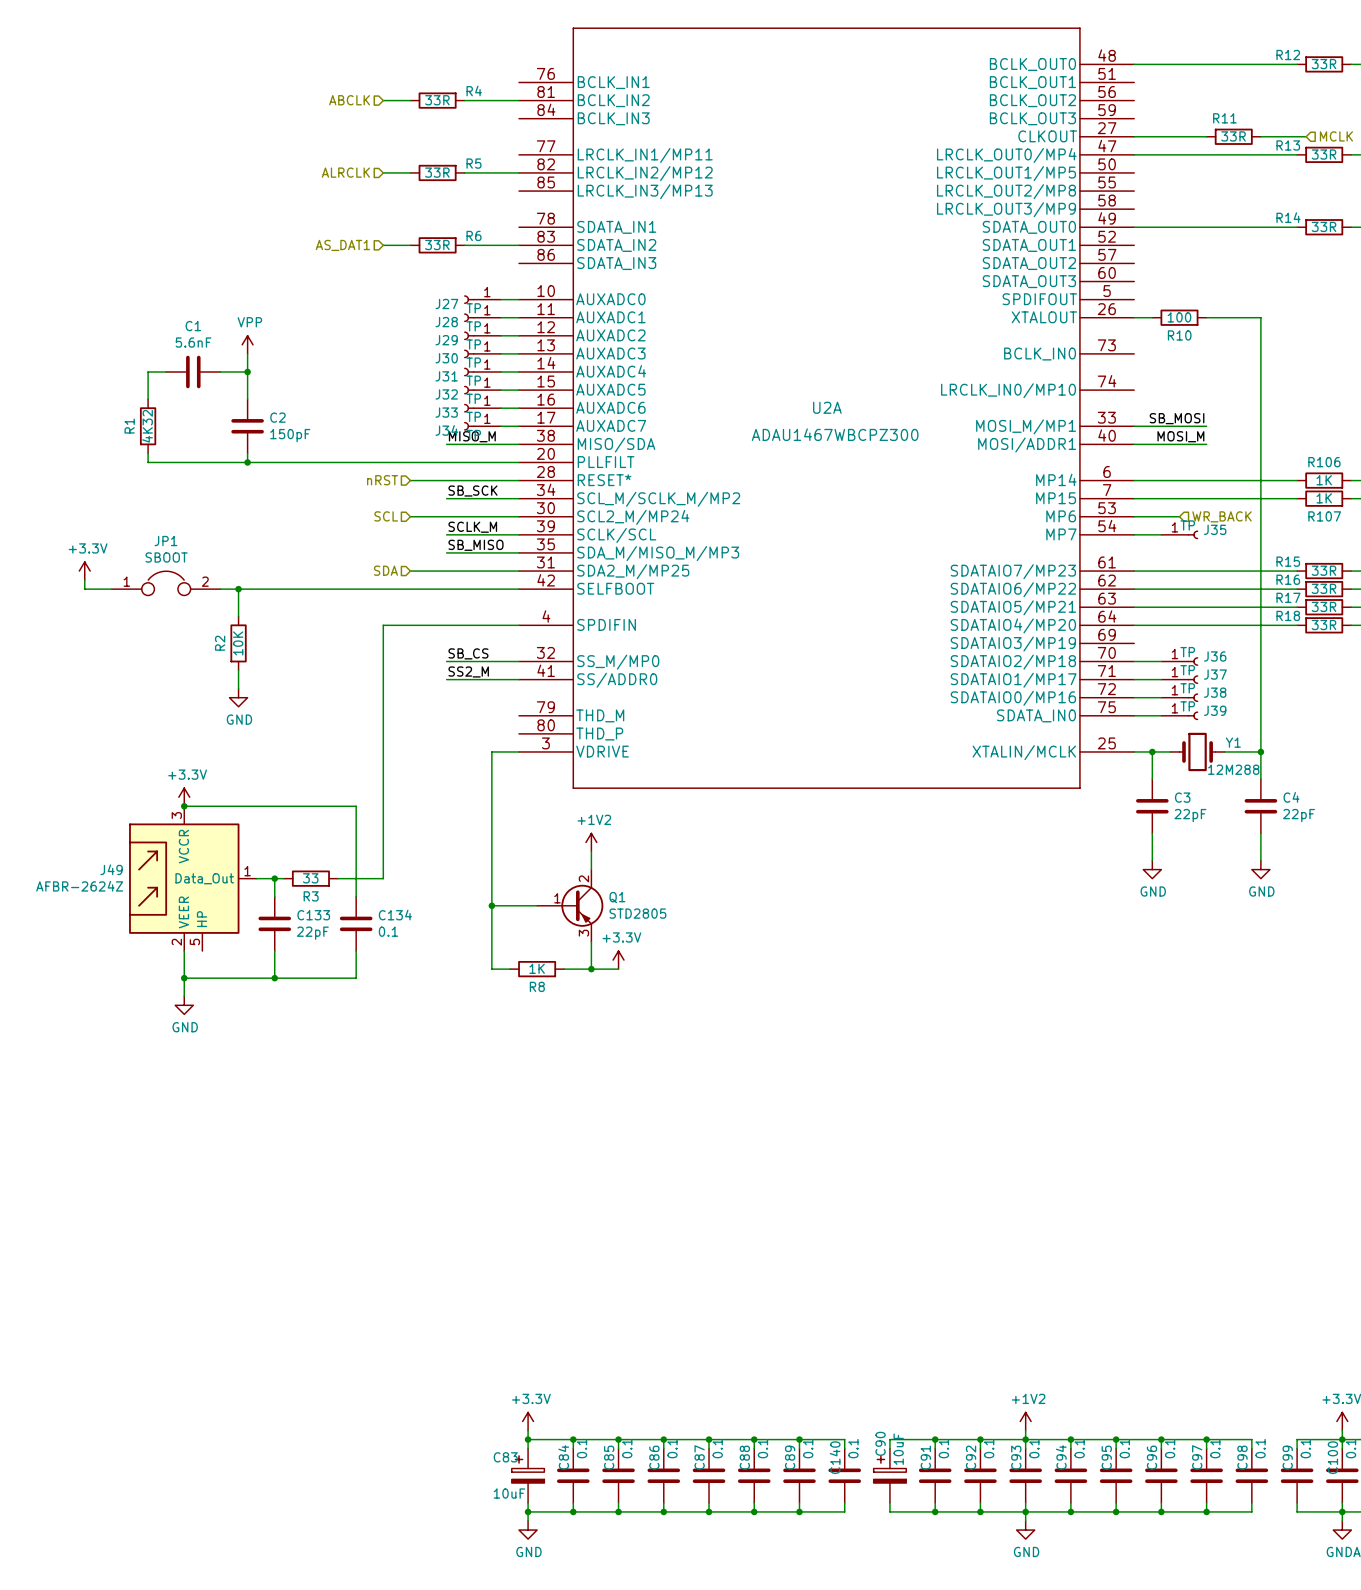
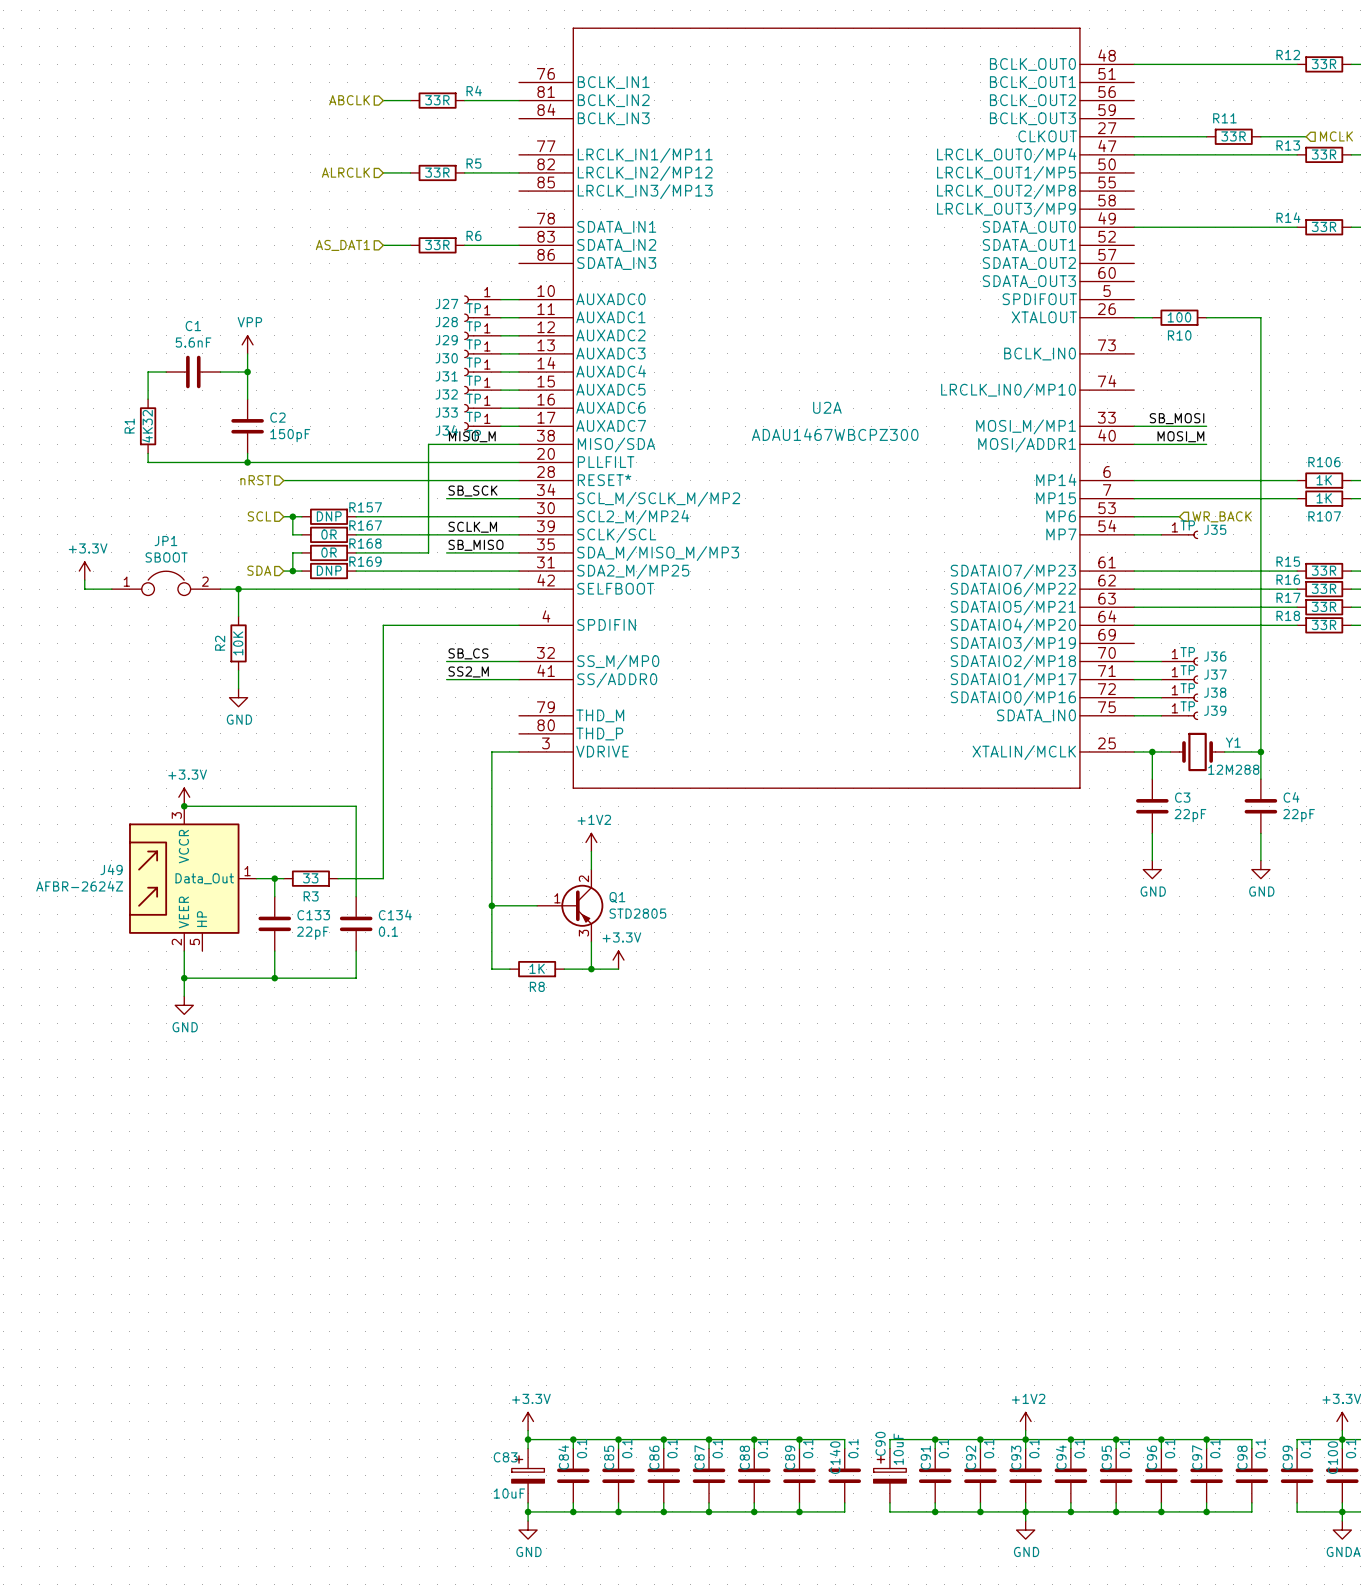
wire: none -> (446, 444) (428, 444) (428, 552) (356, 552)
wire: none -> (283, 480) (410, 480)
hierarchical label position: nRST (382, 480) -> nRST (255, 480)
wire: none -> (283, 516) (301, 516)
wire: none -> (292, 516) (292, 534) (301, 534)
junction: none -> (292, 516)
R157: none -> DNP (329, 516)
wire: none -> (356, 516) (410, 516)
hierarchical label position: SCL (386, 516) -> SCL (259, 516)
R167: none -> 0R (329, 534)
wire: none -> (356, 534) (446, 534)
wire: none -> (301, 552) (292, 552) (292, 571)
R168: none -> 0R (329, 552)
hierarchical label position: SDA (385, 570) -> SDA (259, 570)
wire: none -> (283, 571) (301, 571)
junction: none -> (292, 571)
R169: none -> DNP (329, 571)
wire: none -> (356, 571) (410, 571)

